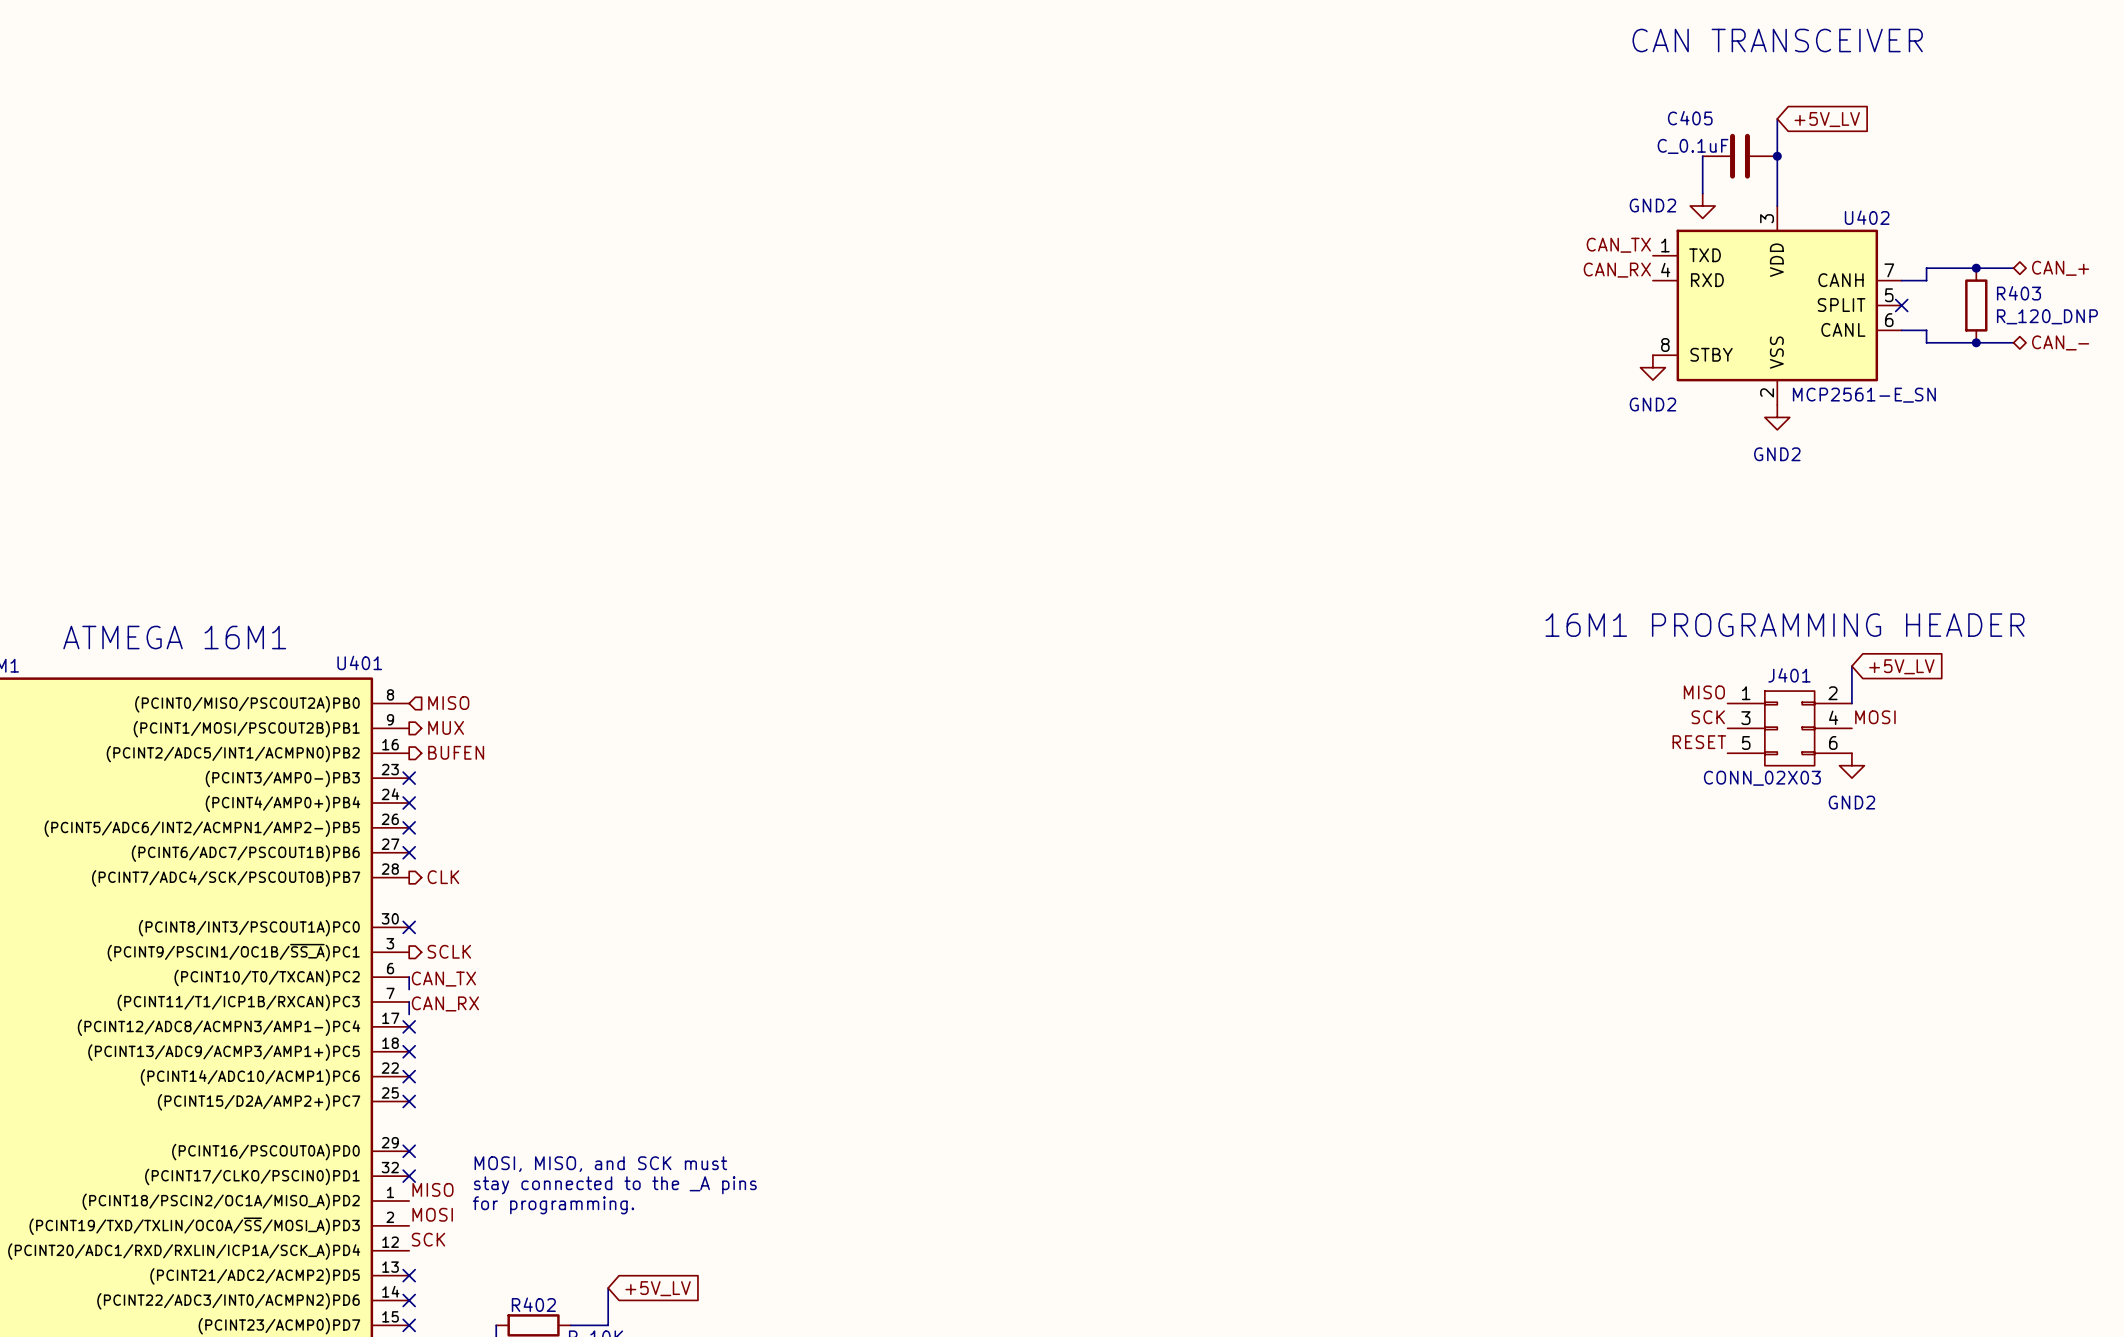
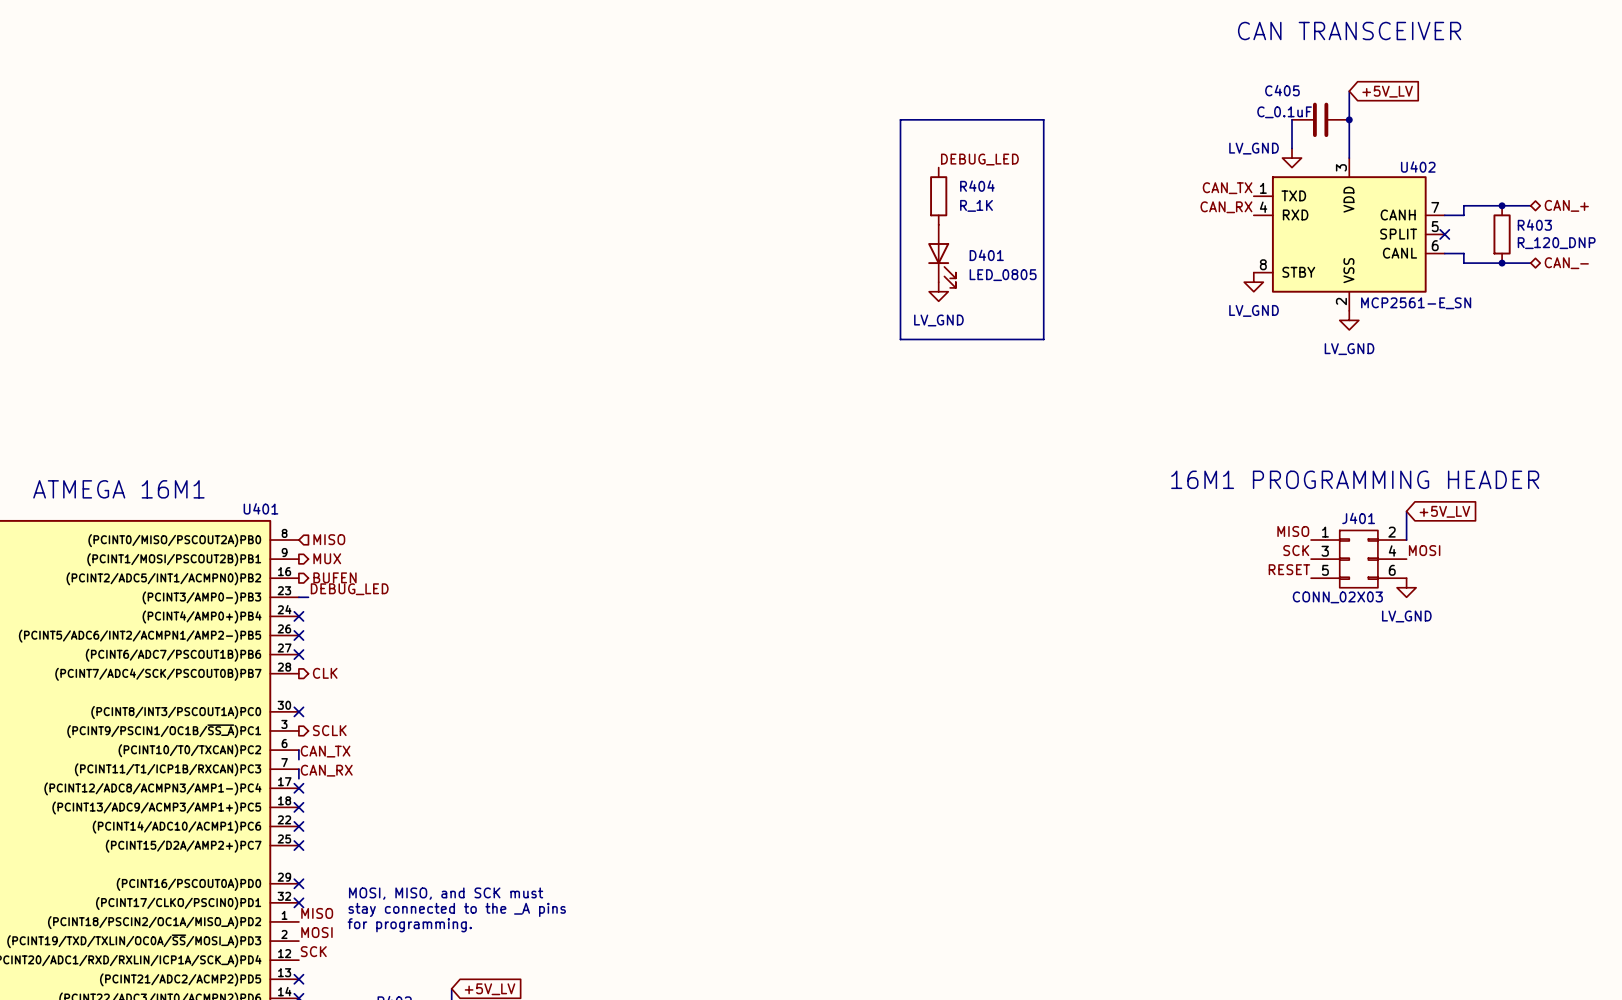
line: none -> (900, 119) (1043, 119) (1043, 339) (900, 339) (900, 119)
power symbol: GND2 (1702, 205) -> LV_GND (1292, 158)
label: none -> DEBUG_LED (979, 159)
R404: none -> R_1K (938, 196)
D401: none -> LED_0805 (942, 256)
power symbol: GND2 (1652, 367) -> LV_GND (1253, 282)
power symbol: none -> LV_GND (938, 291)
power symbol: GND2 (1777, 417) -> LV_GND (1349, 320)
power symbol: GND2 (1851, 765) -> LV_GND (1406, 587)
label: none -> DEBUG_LED (349, 589)
wire: none -> (298, 597) (308, 597)
no-connect mark: (409, 778) -> none

